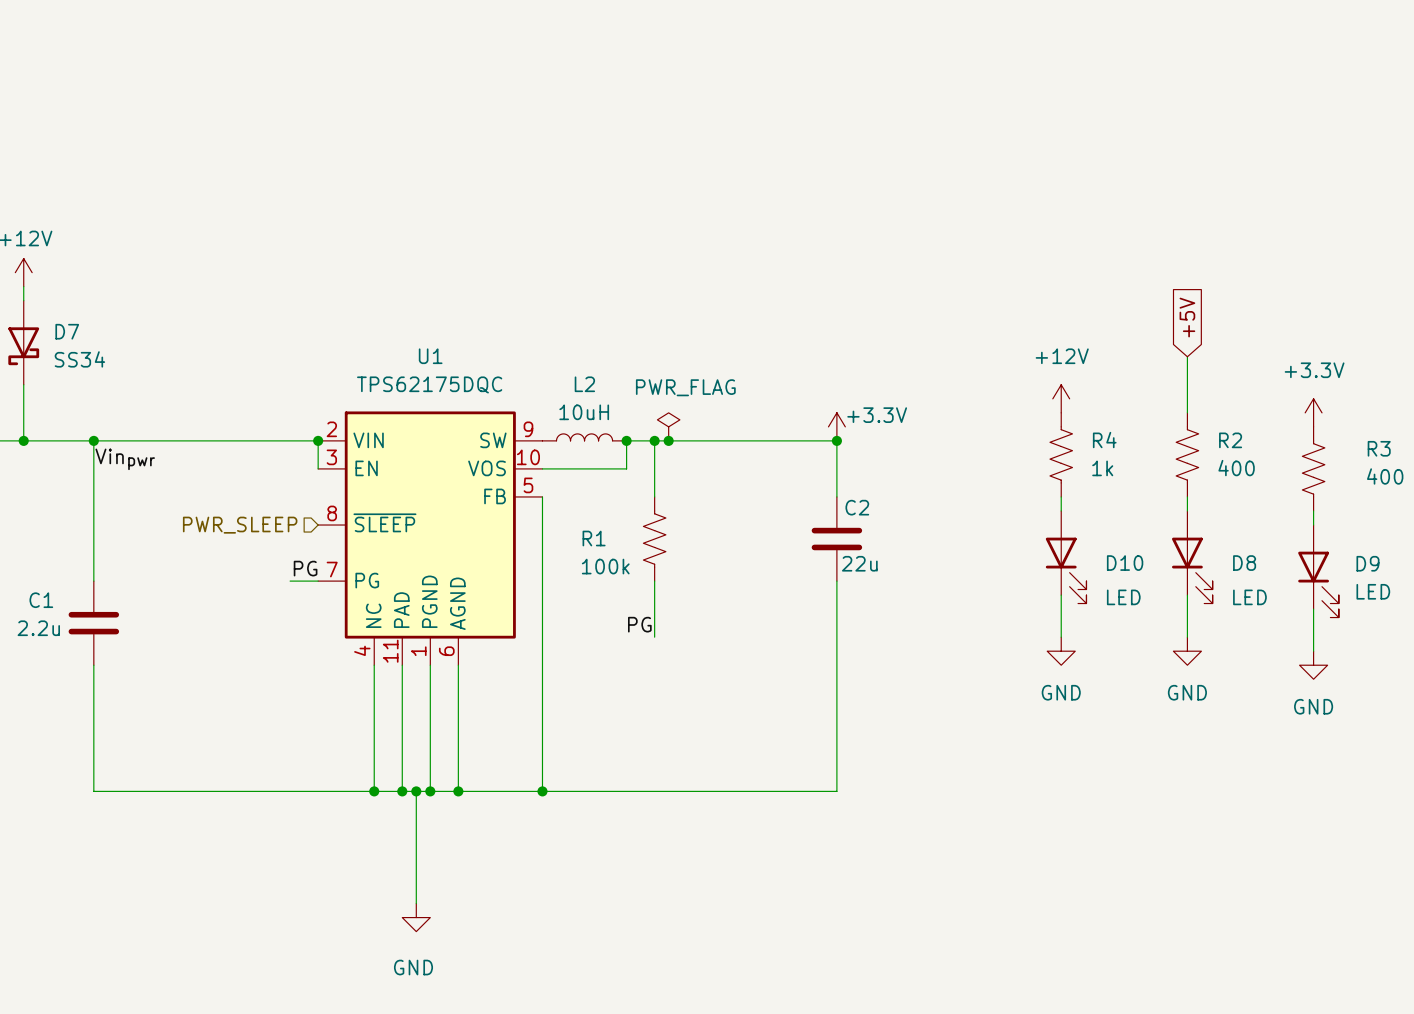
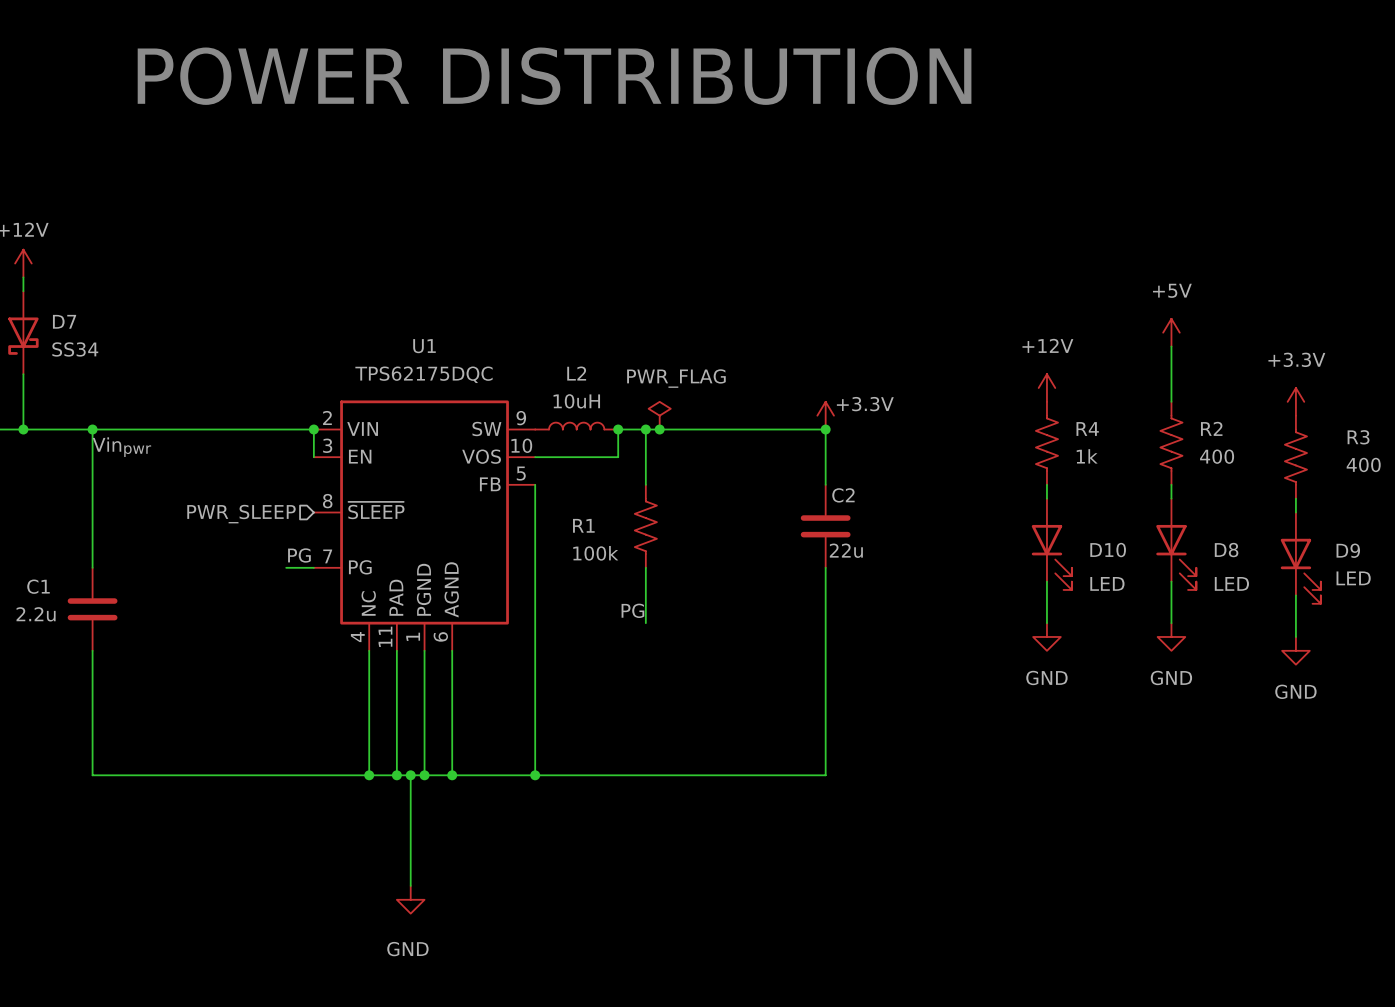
text: none -> POWER DISTRIBUTION (554, 76)
global label: +5V (1187, 317) -> none
power symbol: none -> +5V (1171, 332)

